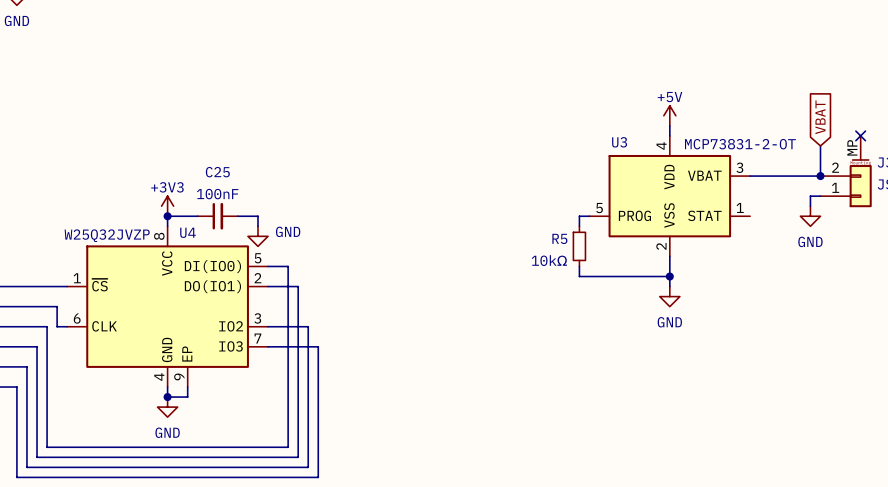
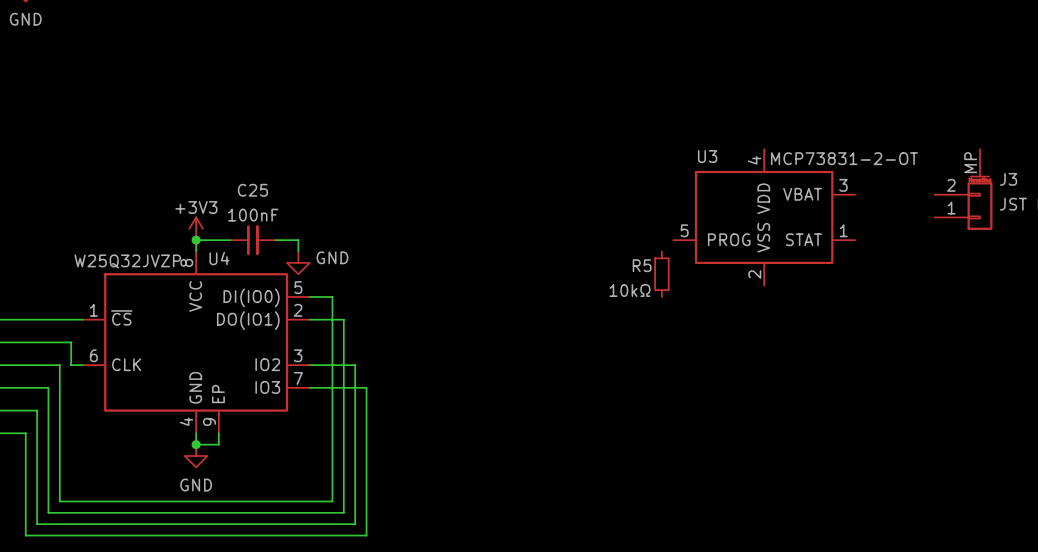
power symbol: +5V (669, 115) -> none
global label: VBAT (820, 117) -> none
wire: (669, 125) (669, 135) -> none
no-connect mark: (860, 135) -> none
wire: (820, 145) (820, 176) (750, 176) -> none
junction: (820, 176) -> none
wire: (820, 196) (810, 196) (810, 206) -> none
wire: (589, 216) (579, 216) (579, 226) -> none
power symbol: GND (810, 216) -> none
wire: (669, 256) (669, 286) -> none
wire: (579, 266) (579, 276) (669, 276) -> none
junction: (669, 276) -> none
power symbol: GND (669, 296) -> none

